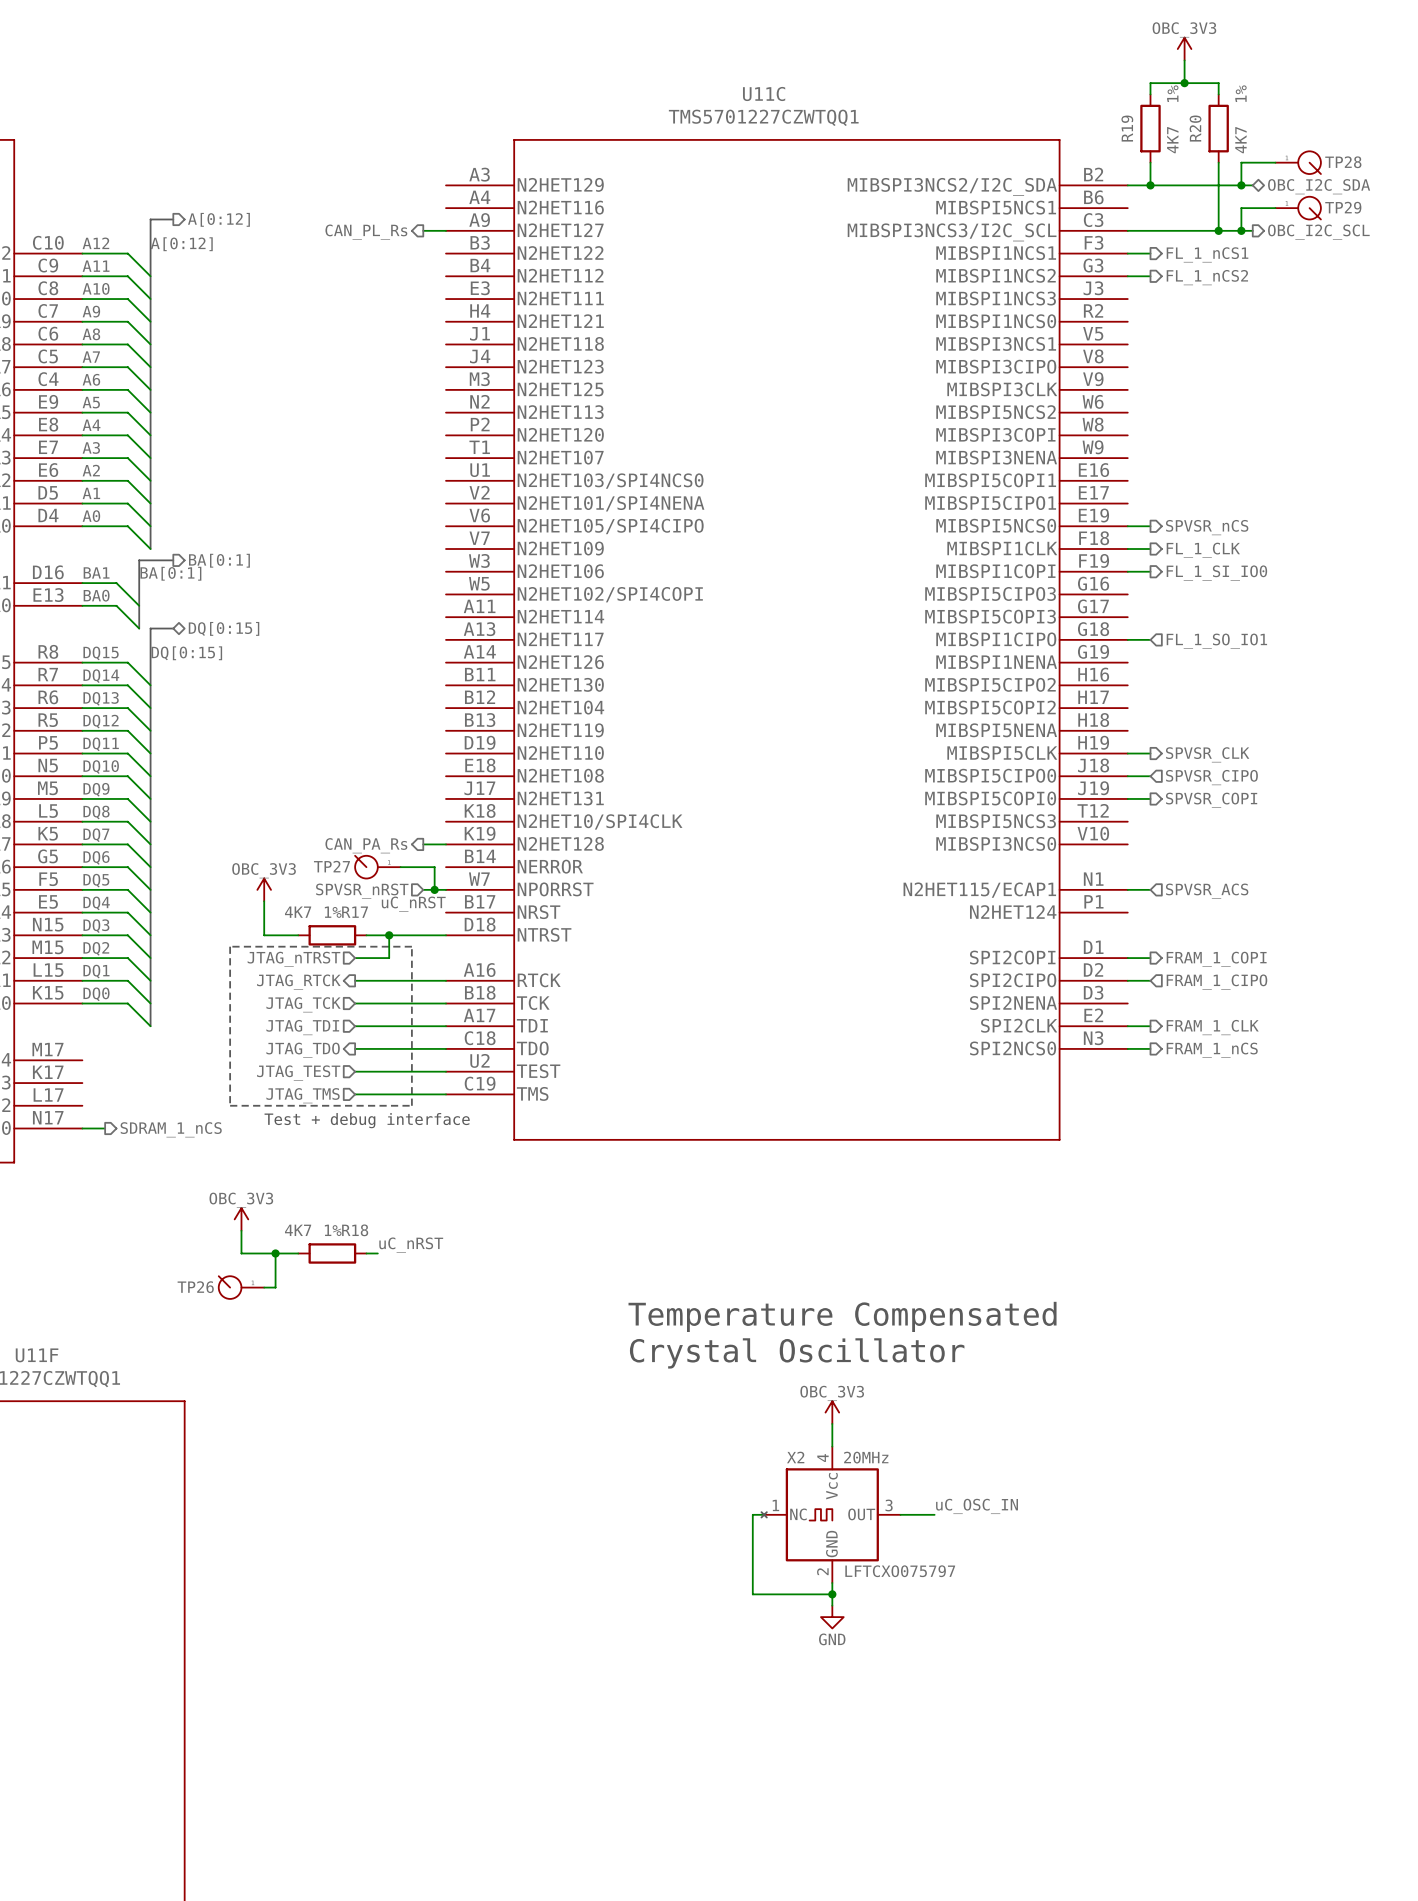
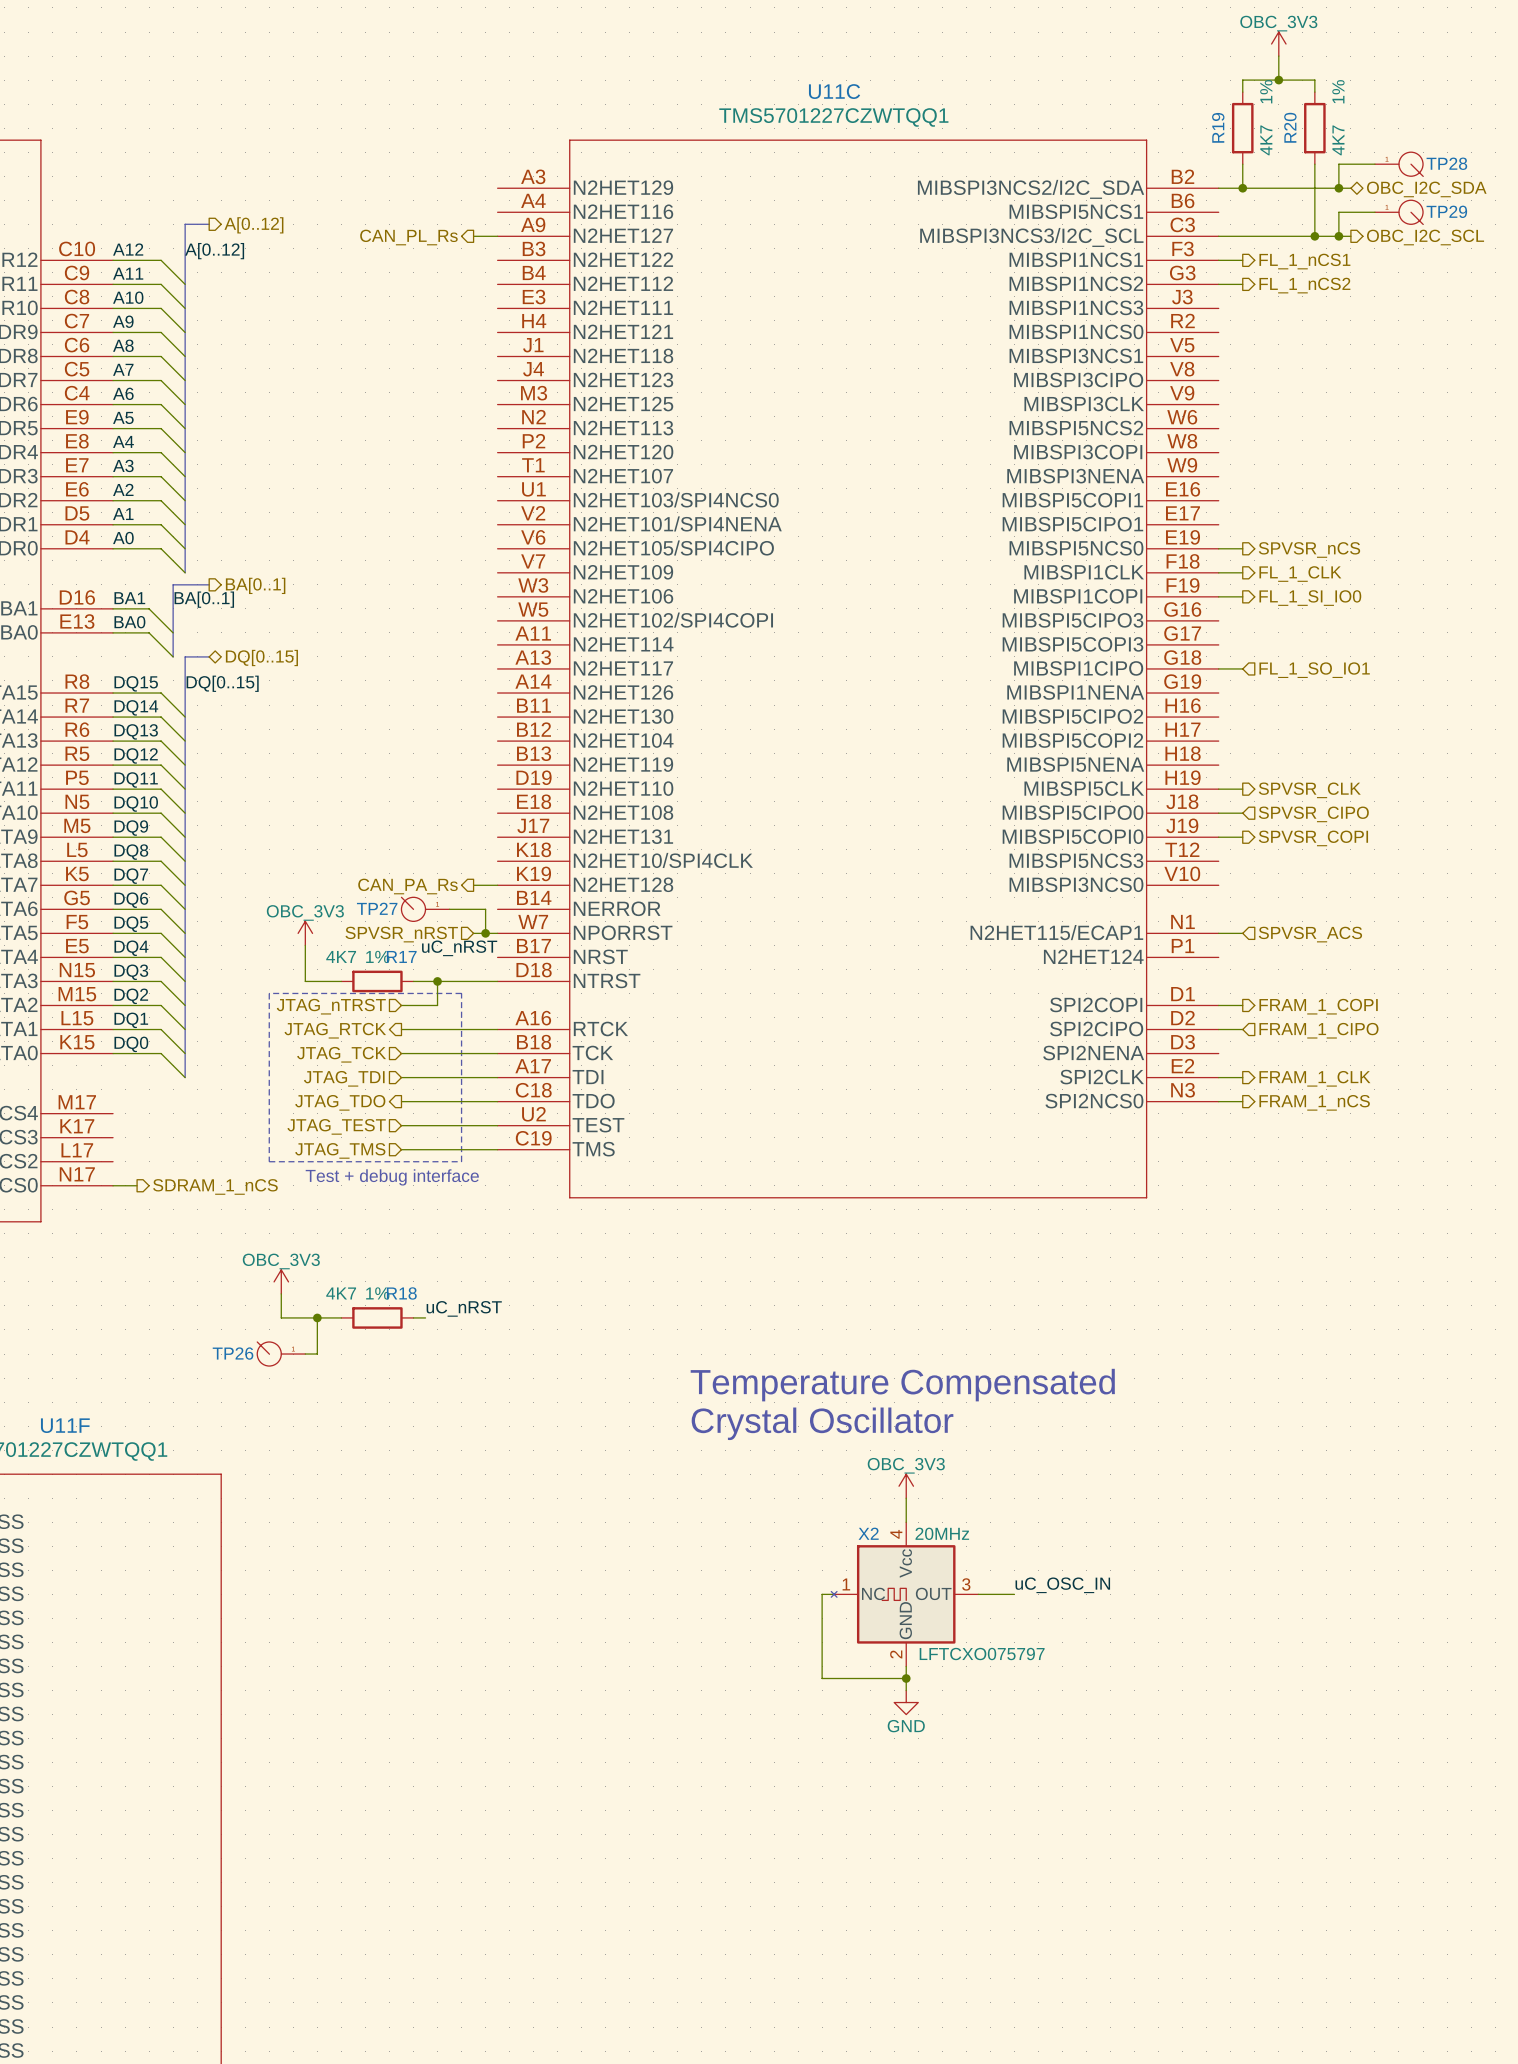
hierarchical label: A[0:12] (218, 219) -> A[0..12] (253, 225)
label: A[0:12] (181, 244) -> A[0..12] (214, 251)
hierarchical label: BA[0:1] (219, 560) -> BA[0..1] (255, 585)
label: BA[0:1] (170, 573) -> BA[0..1] (204, 599)
hierarchical label: DQ[0:15] (224, 628) -> DQ[0..15] (261, 657)
label: DQ[0:15] (186, 653) -> DQ[0..15] (222, 683)

